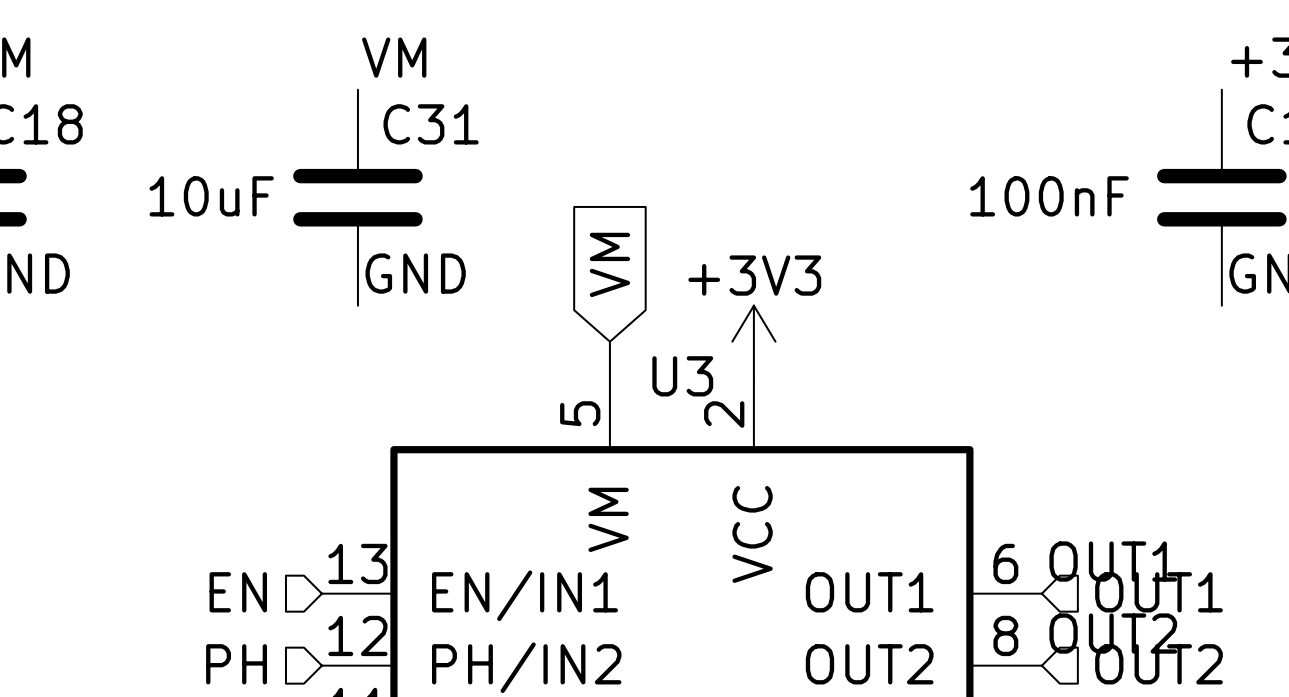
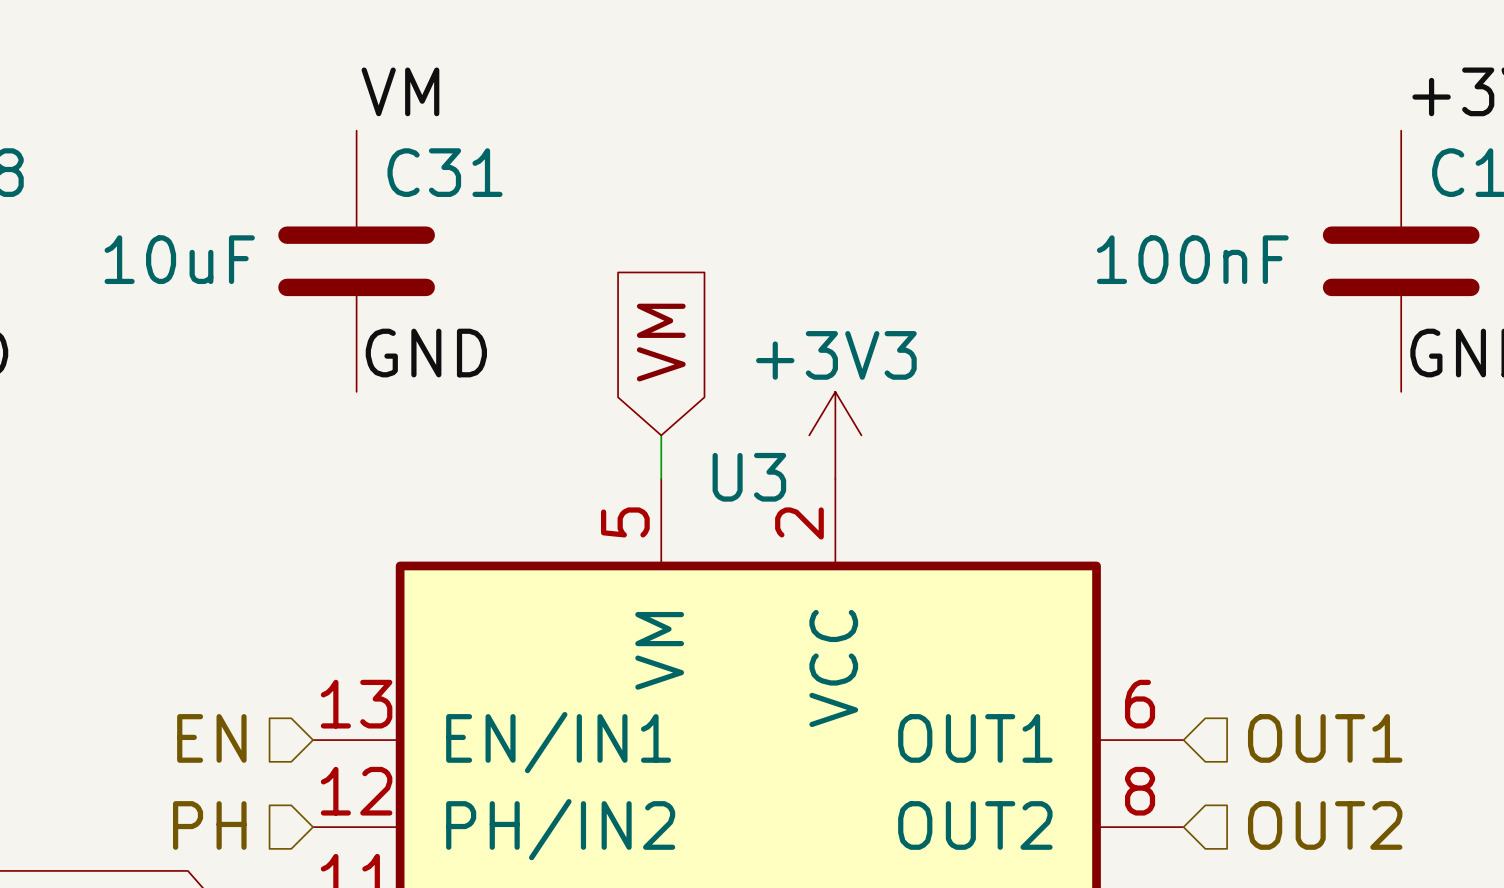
label: OUT1 (1113, 561) -> none
label: OUT2 (1113, 633) -> none

